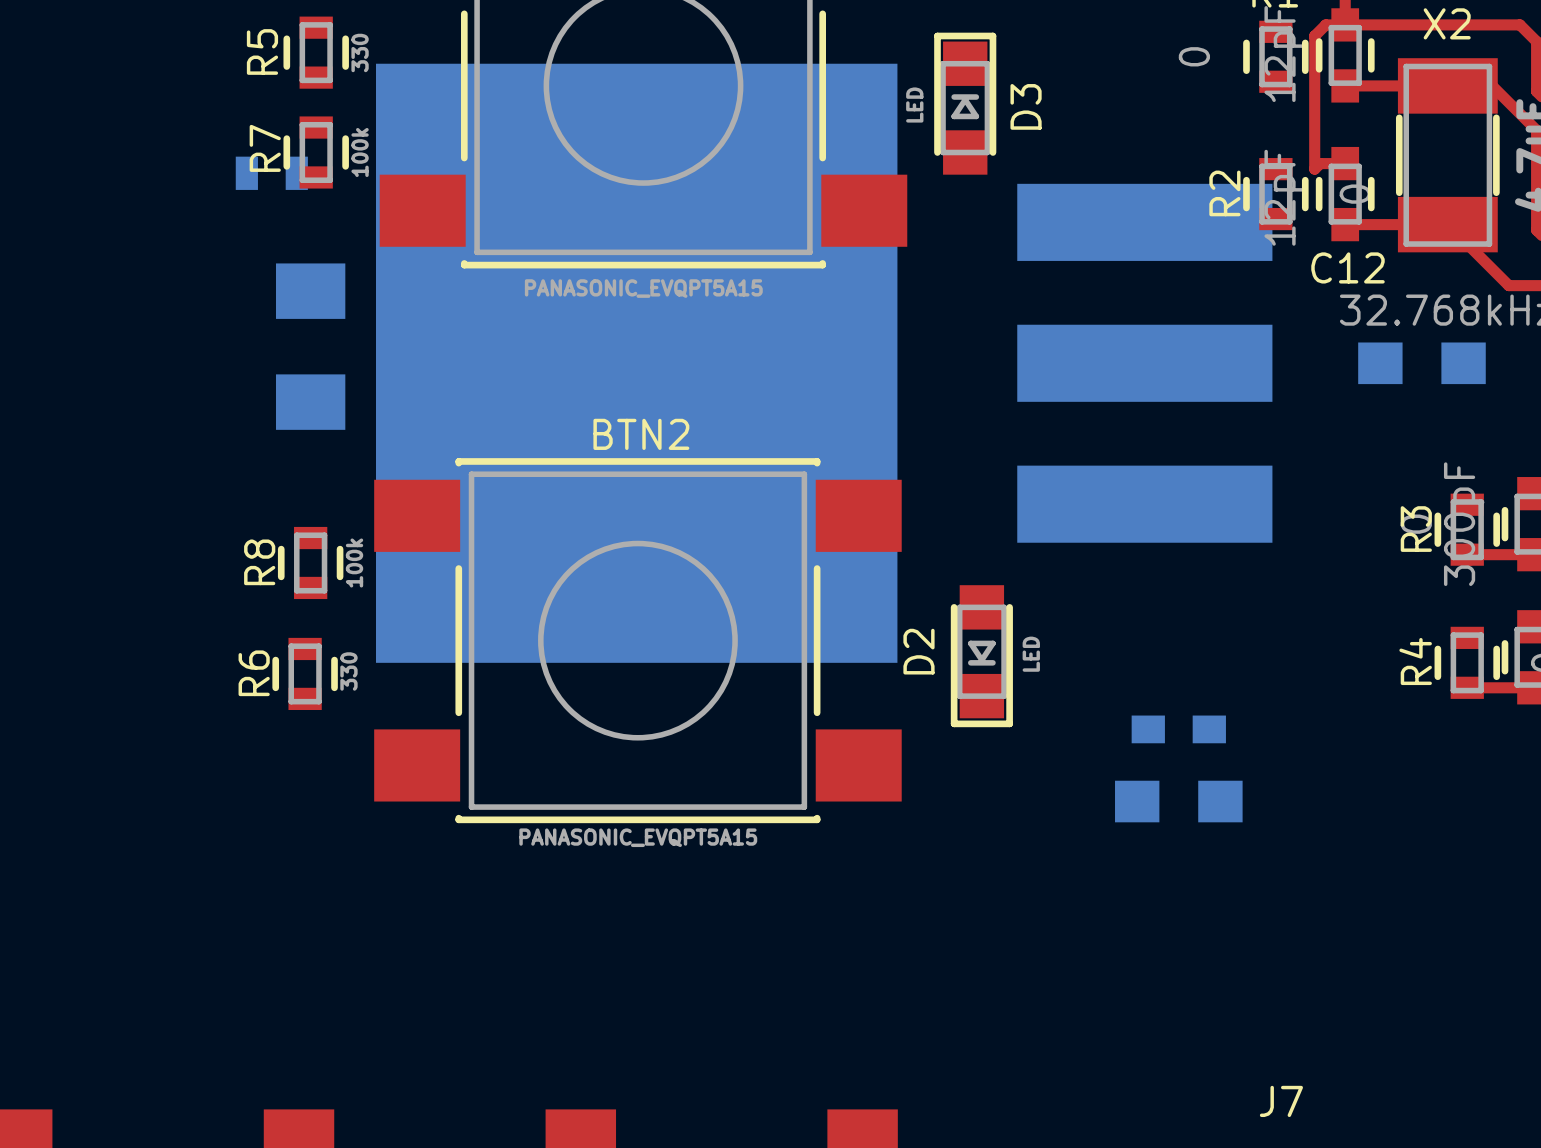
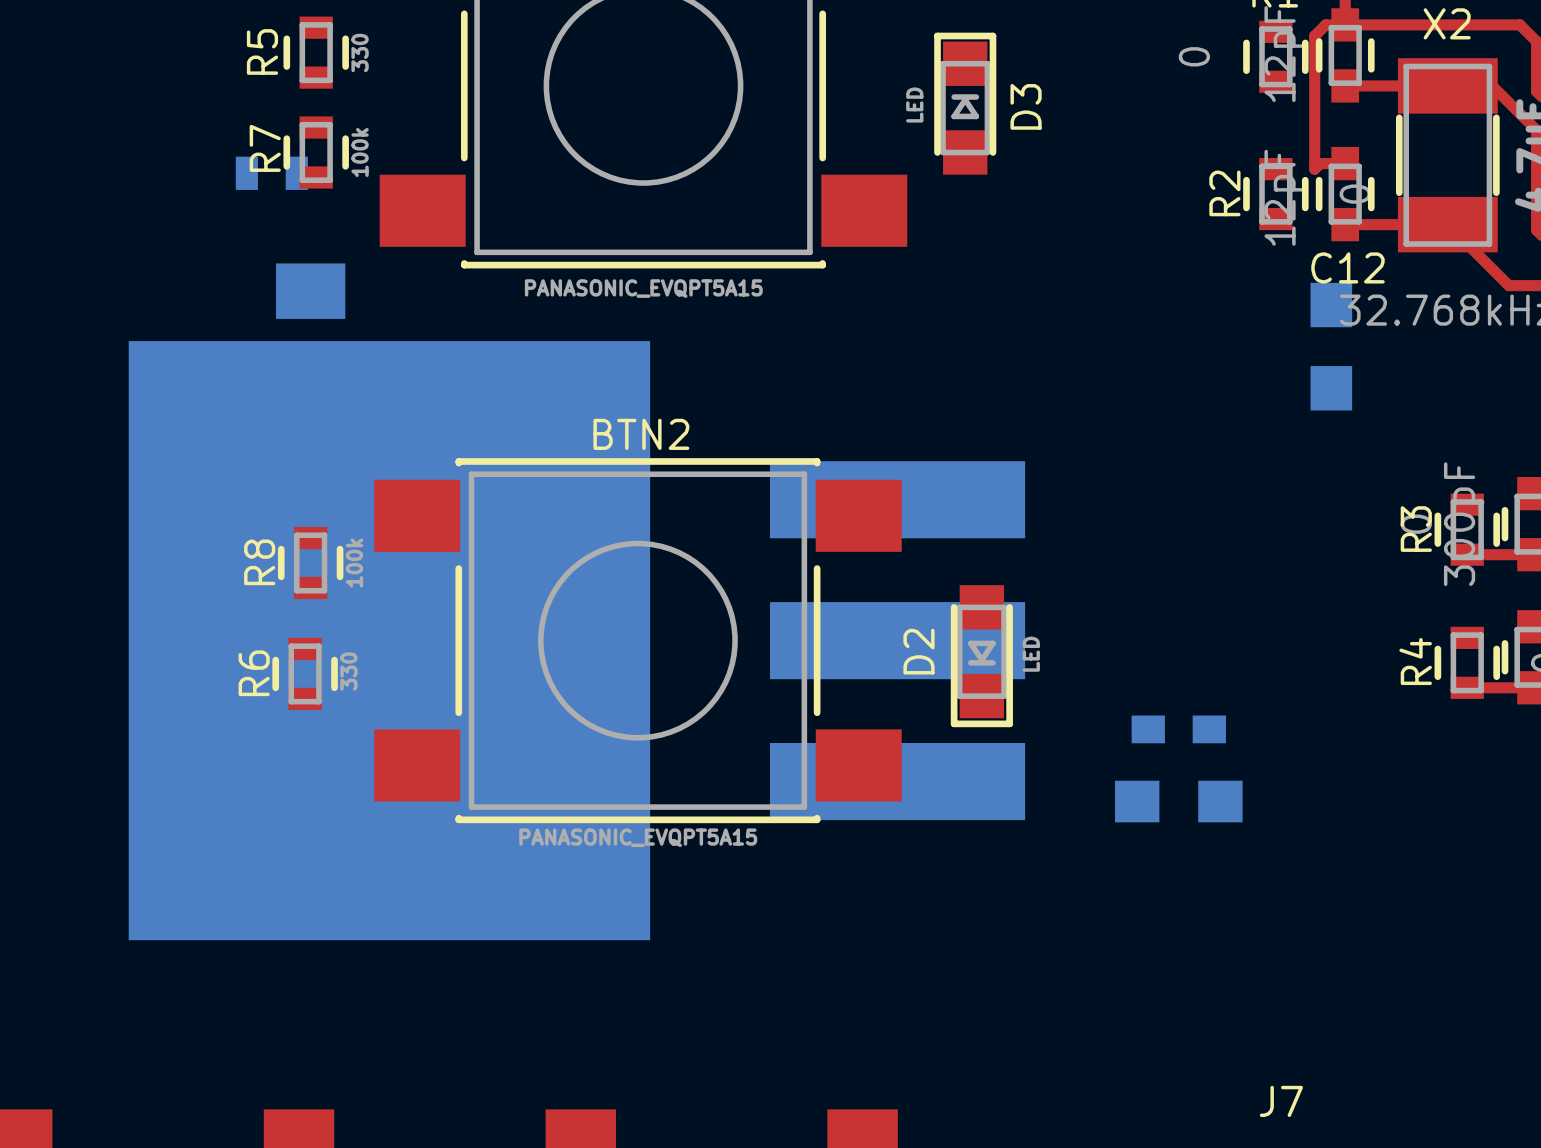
part position: (824, 363) -> (576, 640)
part rotation: 0° (1421, 363) -> 90° clockwise (1331, 346)
part position: (1421, 363) -> (1331, 346)

